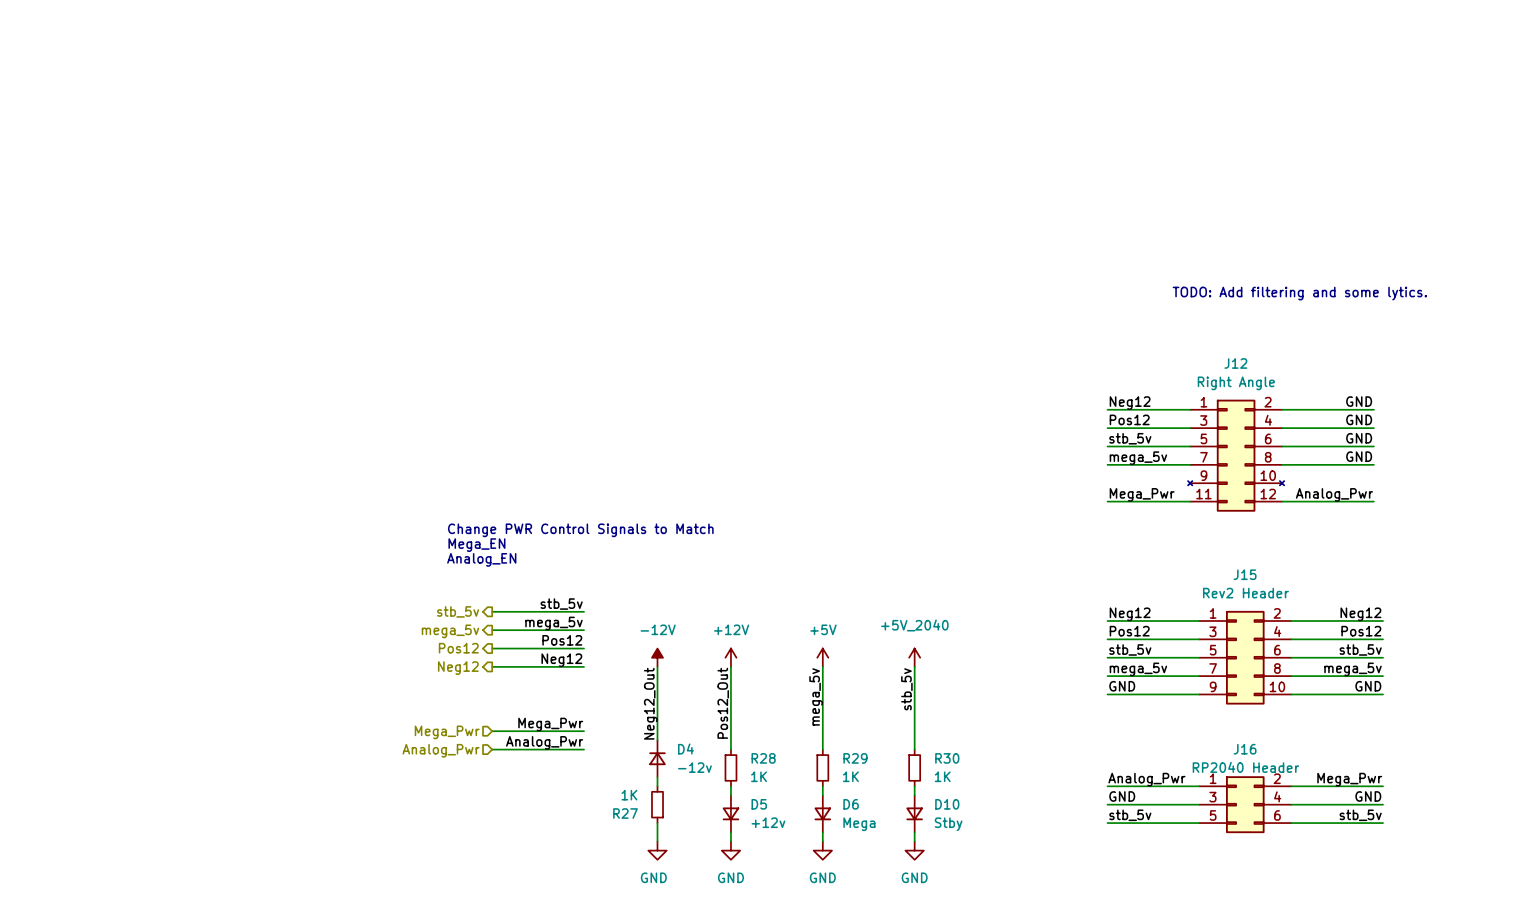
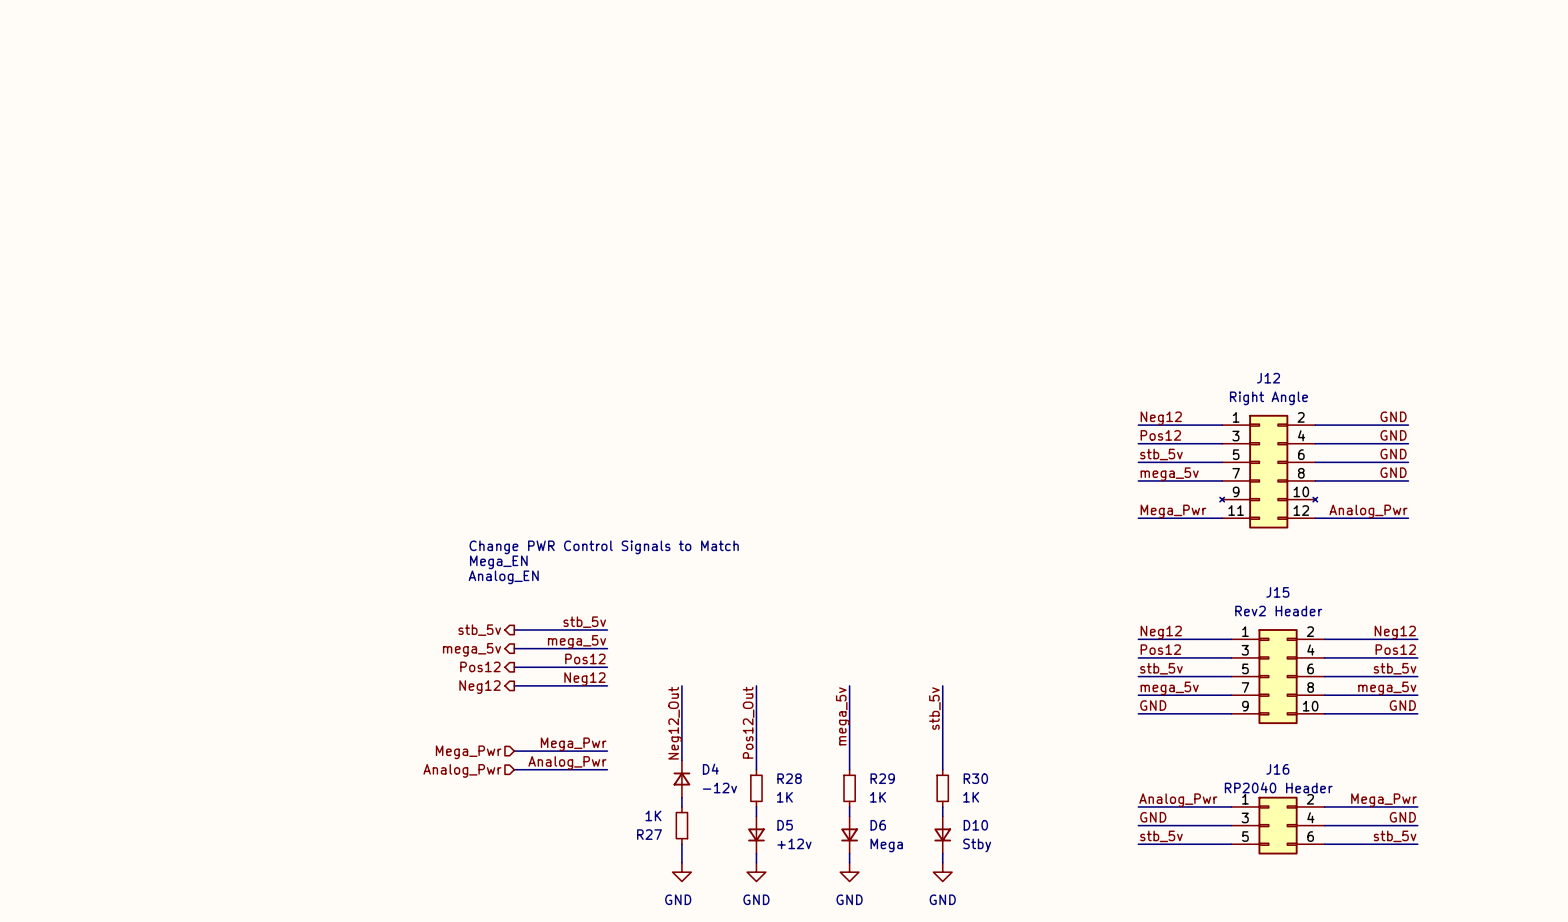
text: TODO: Add filtering and some lytics. (1299, 293) -> none
power symbol: -12V (657, 657) -> none
power symbol: +12V (730, 657) -> none
power symbol: +5V (822, 657) -> none
power symbol: +5V_2040 (914, 657) -> none

